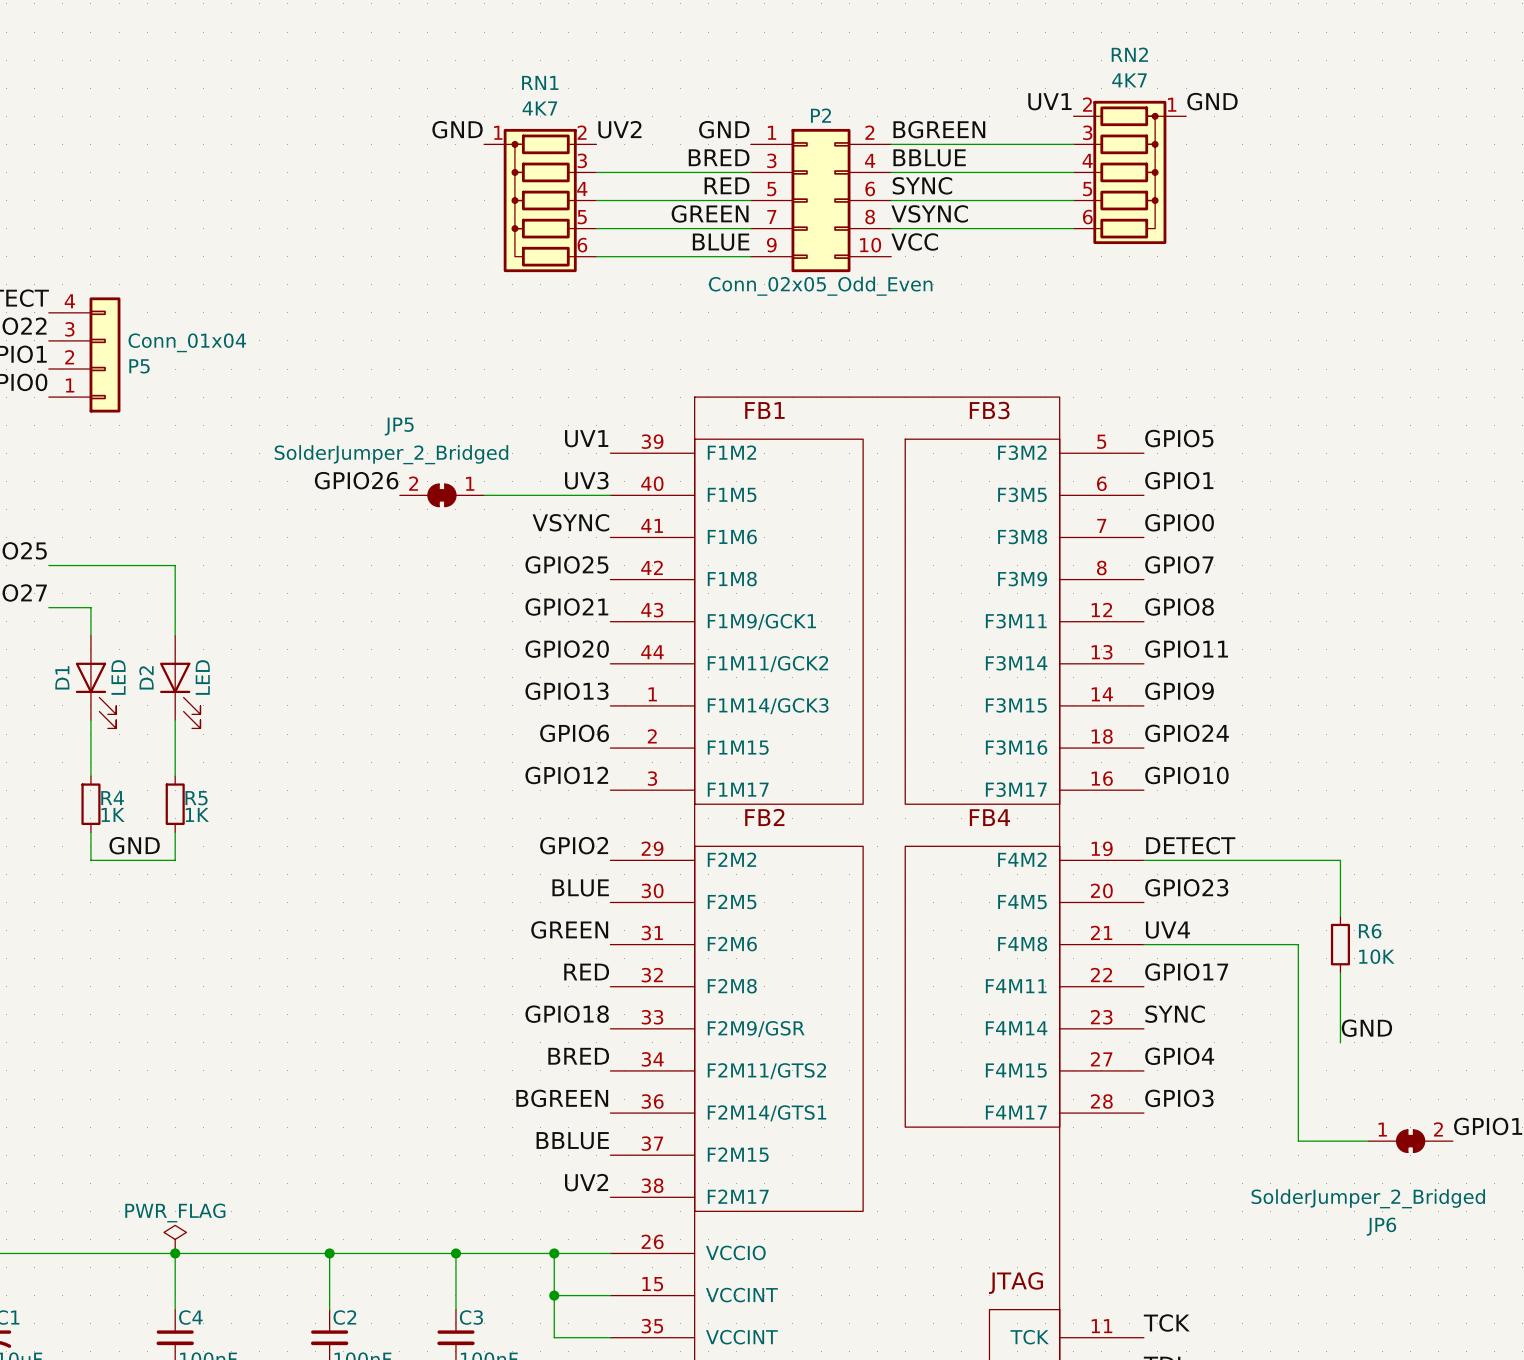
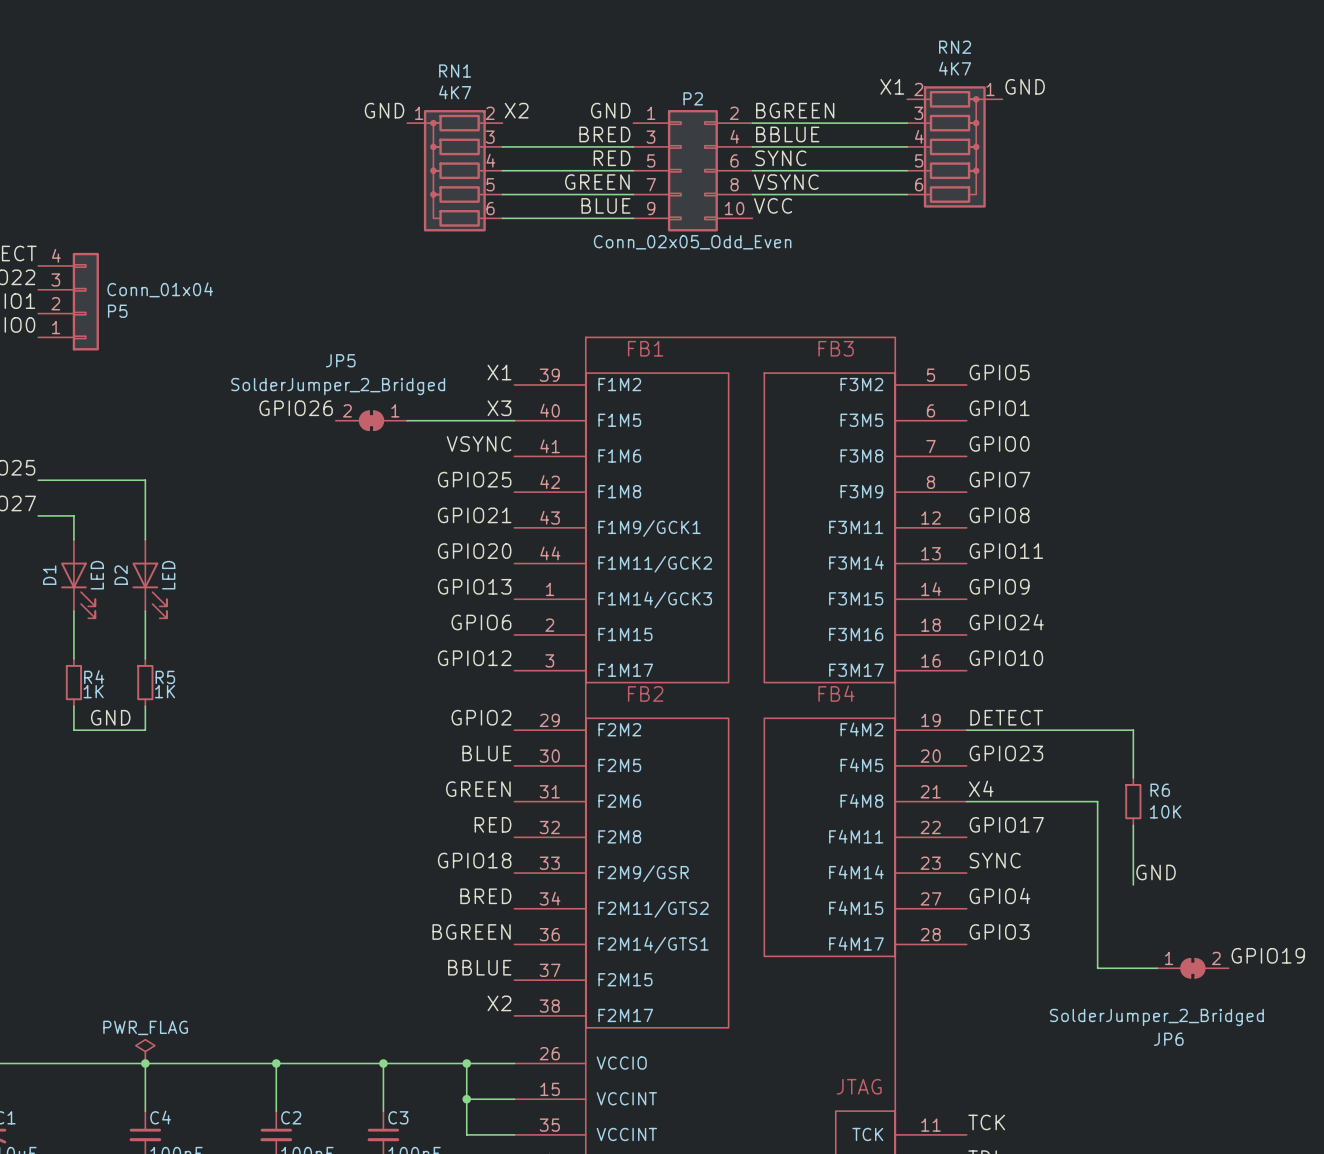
label: UV1 (1049, 101) -> X1 (892, 86)
label: UV2 (619, 129) -> X2 (516, 110)
label: UV1 (586, 438) -> X1 (499, 372)
label: UV3 (586, 480) -> X3 (499, 408)
label: UV4 (1167, 930) -> X4 (981, 788)
label: UV2 (586, 1182) -> X2 (499, 1003)

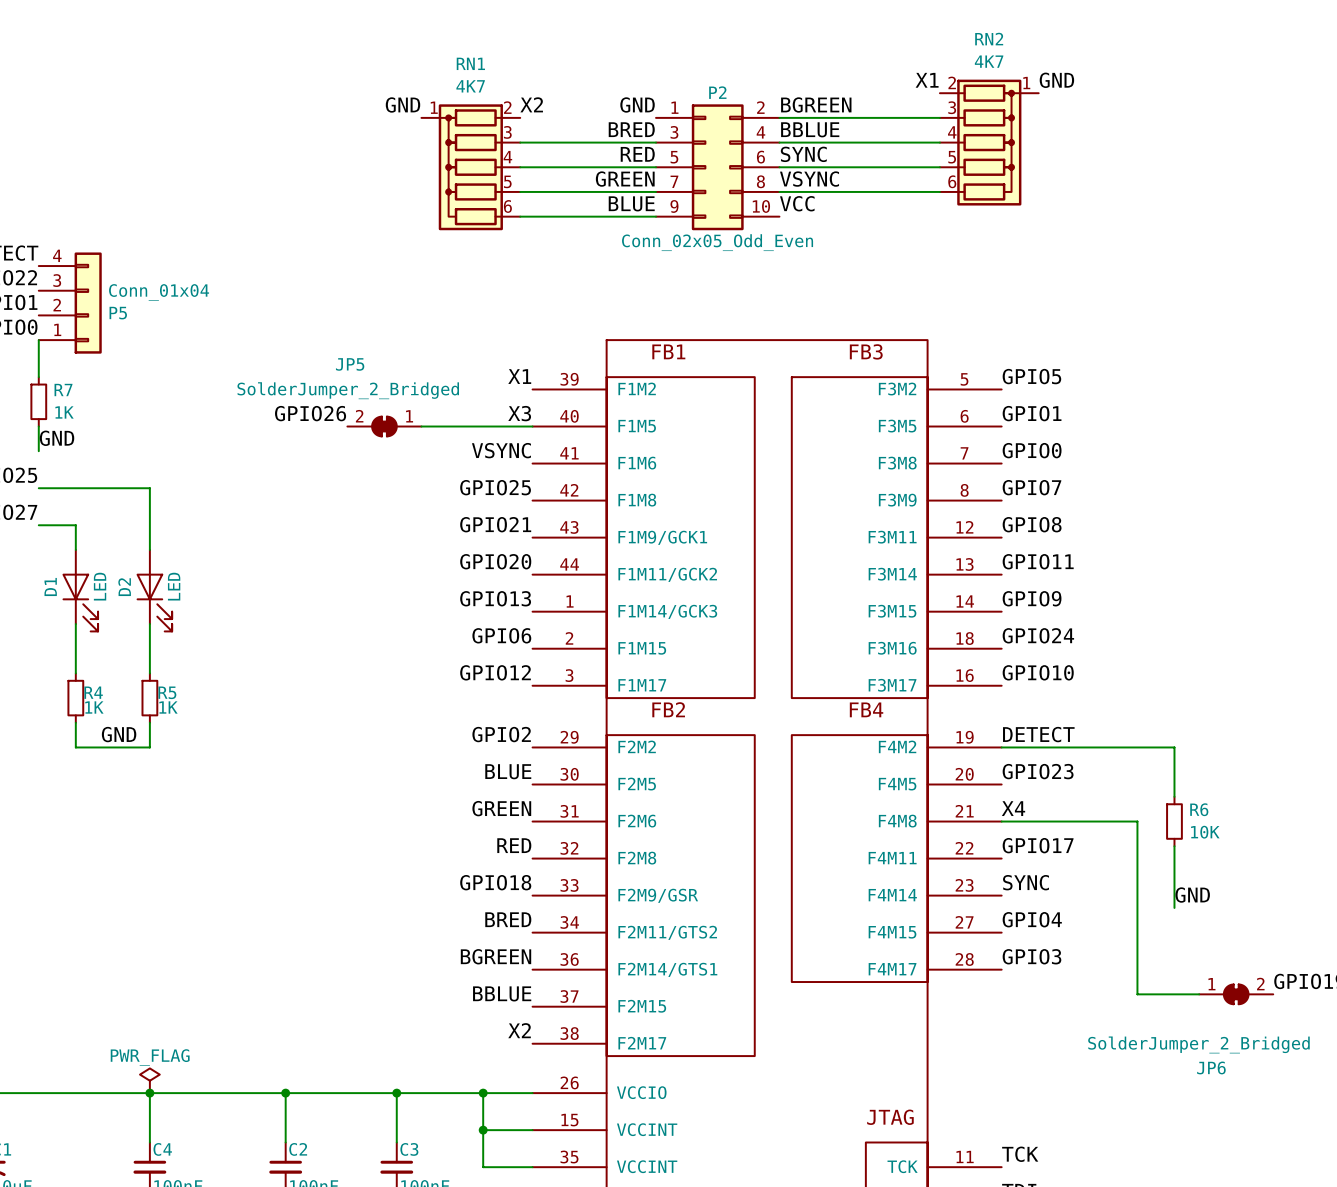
wire: none -> (38, 340) (38, 377)
R7: none -> 1K (38, 401)
wire: none -> (38, 426) (38, 451)
label: none -> GND (57, 438)

